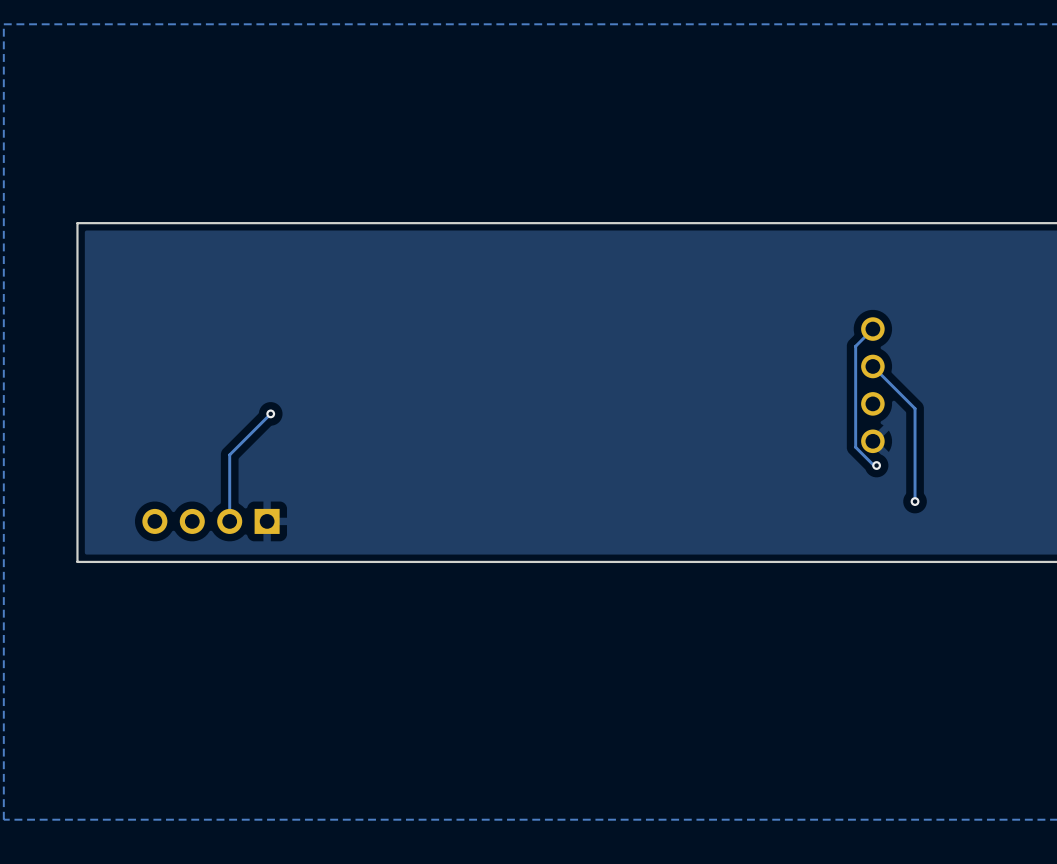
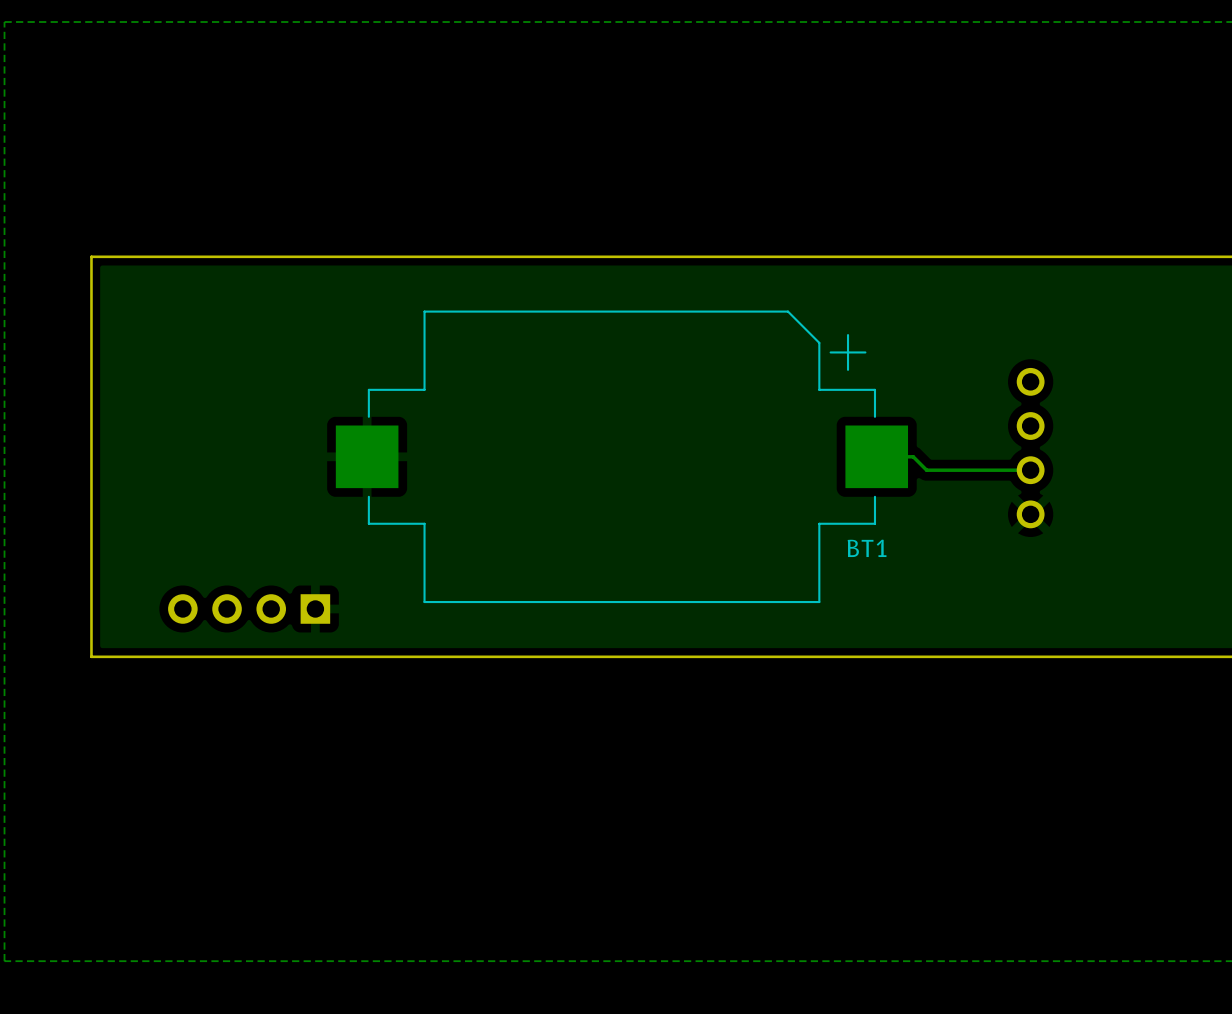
track: (872, 329) (855, 346) (855, 447) (873, 465) (876, 465) -> none
track: (872, 366) (915, 408) (915, 501) -> none
BT1: none -> (621, 456)
track: none -> (876, 456) (913, 456) (926, 470) (1030, 470)
track: (270, 413) (229, 454) (229, 521) -> none
via: (270, 413) -> none
via: (876, 465) -> none
via: (915, 501) -> none

